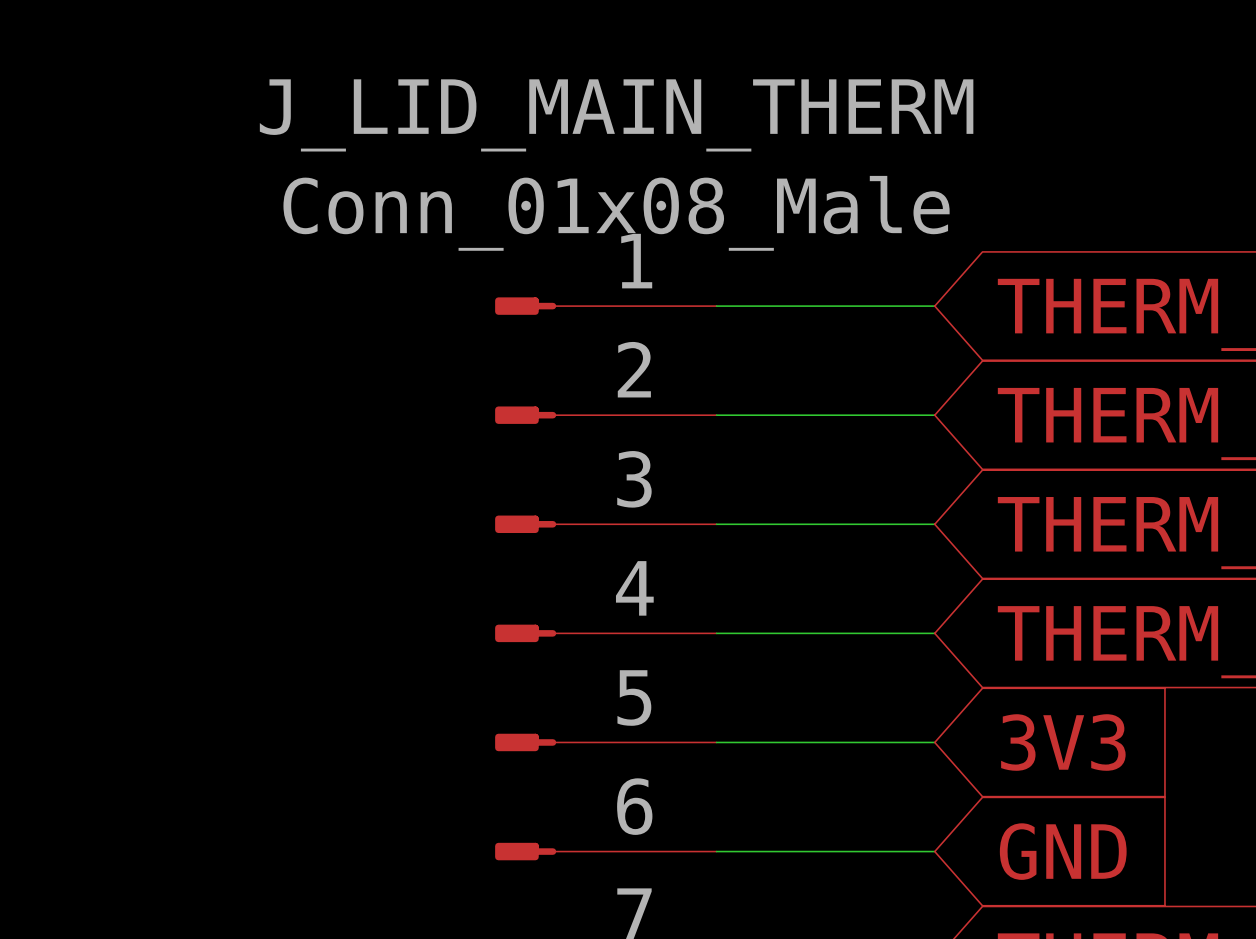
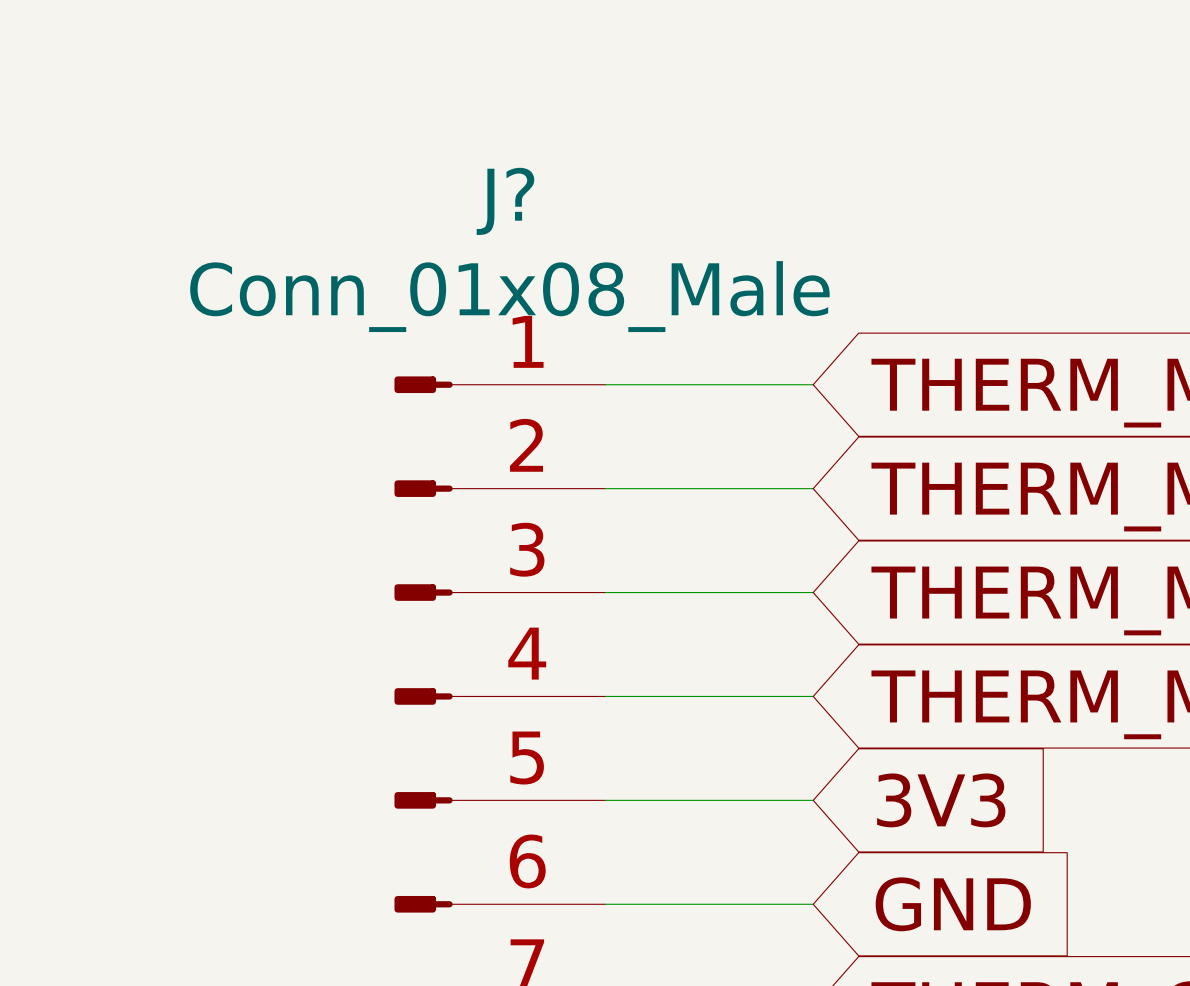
J_LID_MAIN_THERM name: J_LID_MAIN_THERM (616, 115) -> J? (505, 201)

